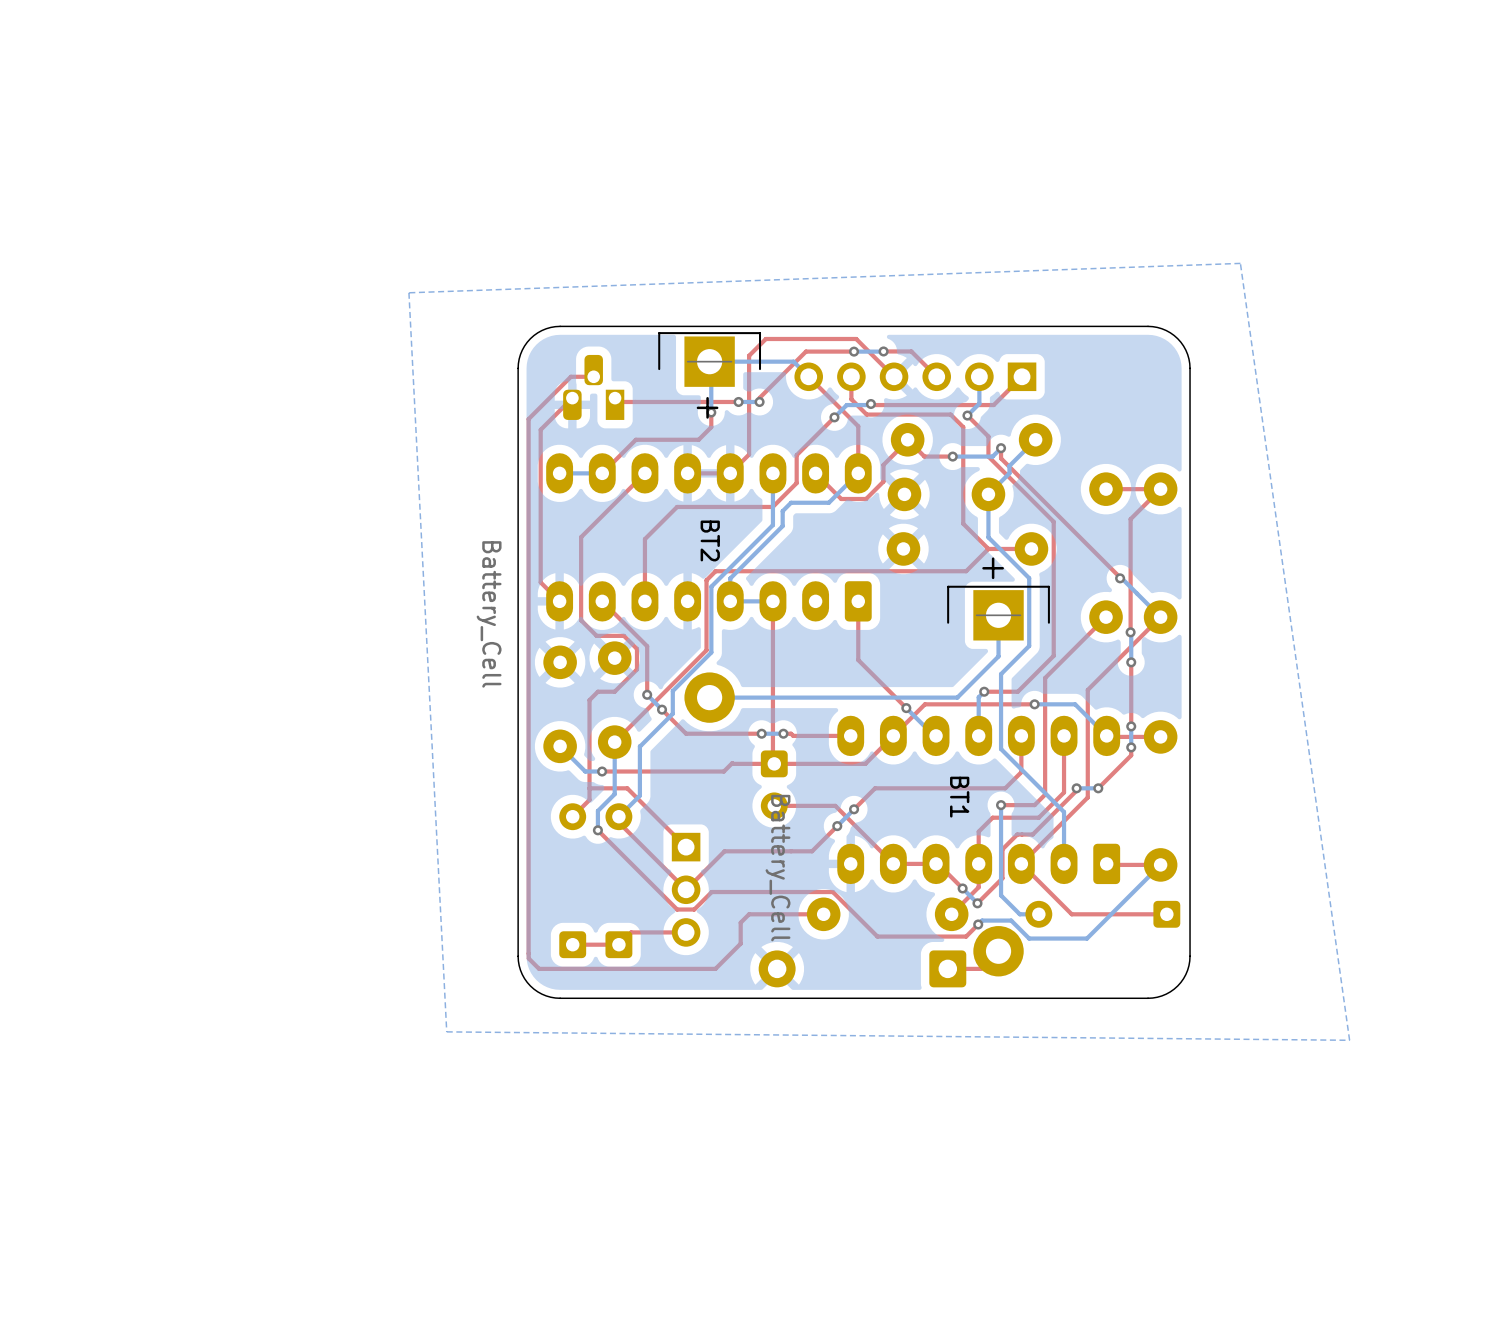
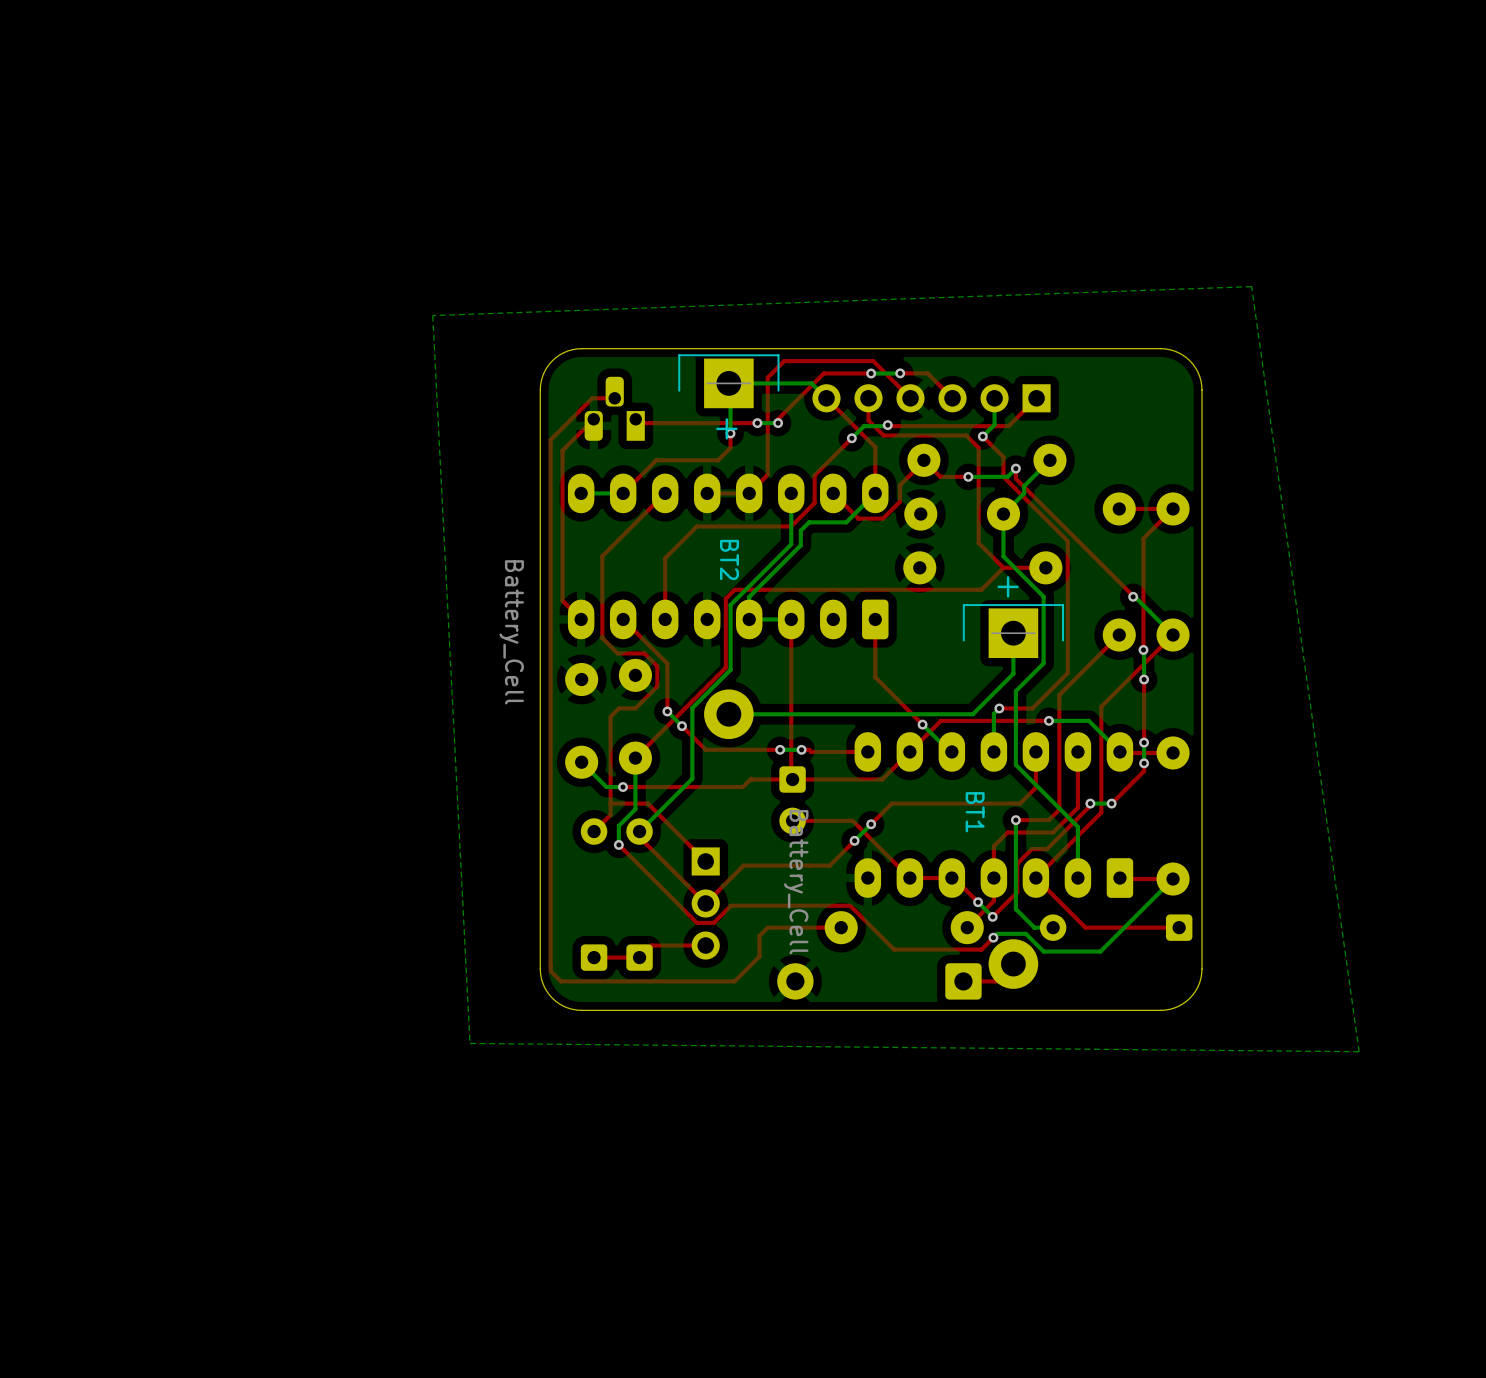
bottom track: (672, 691) (672, 713) (640, 746) -> (692, 707) (692, 778) (660, 810)
bottom track: (639, 746) (639, 795) -> none

